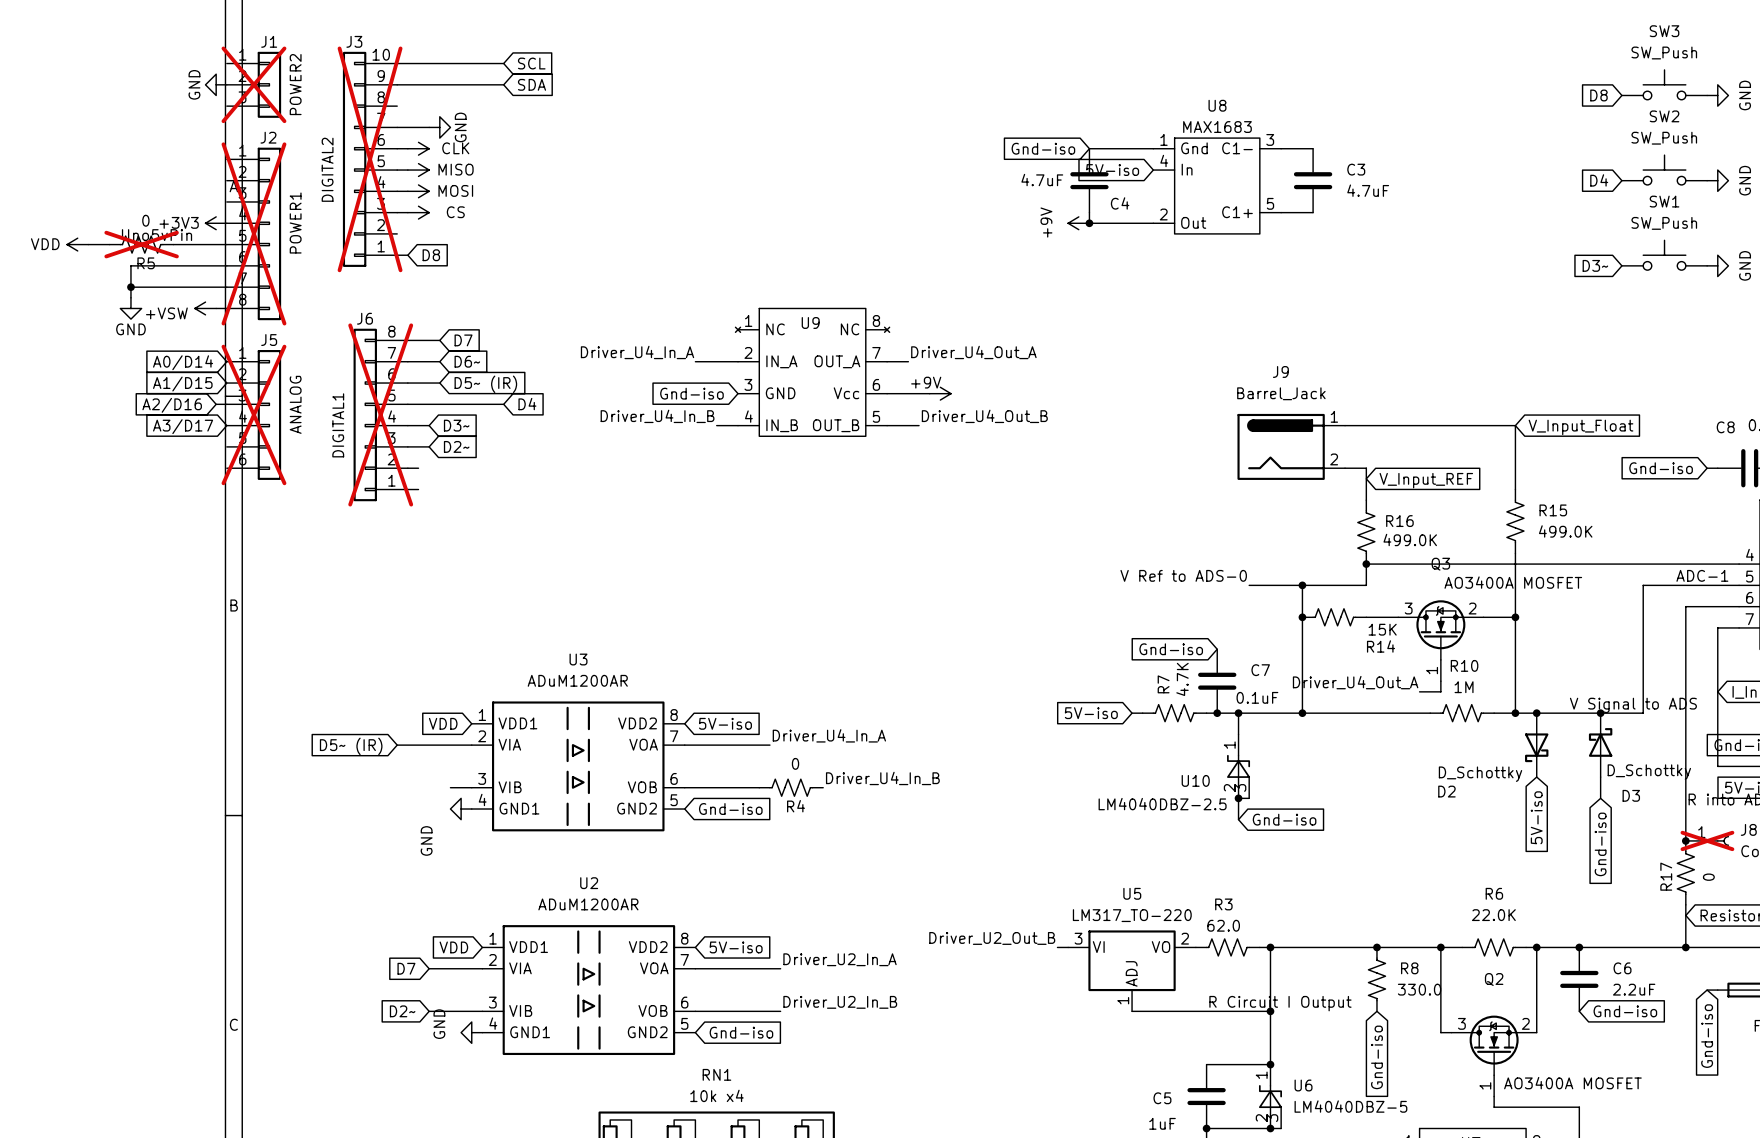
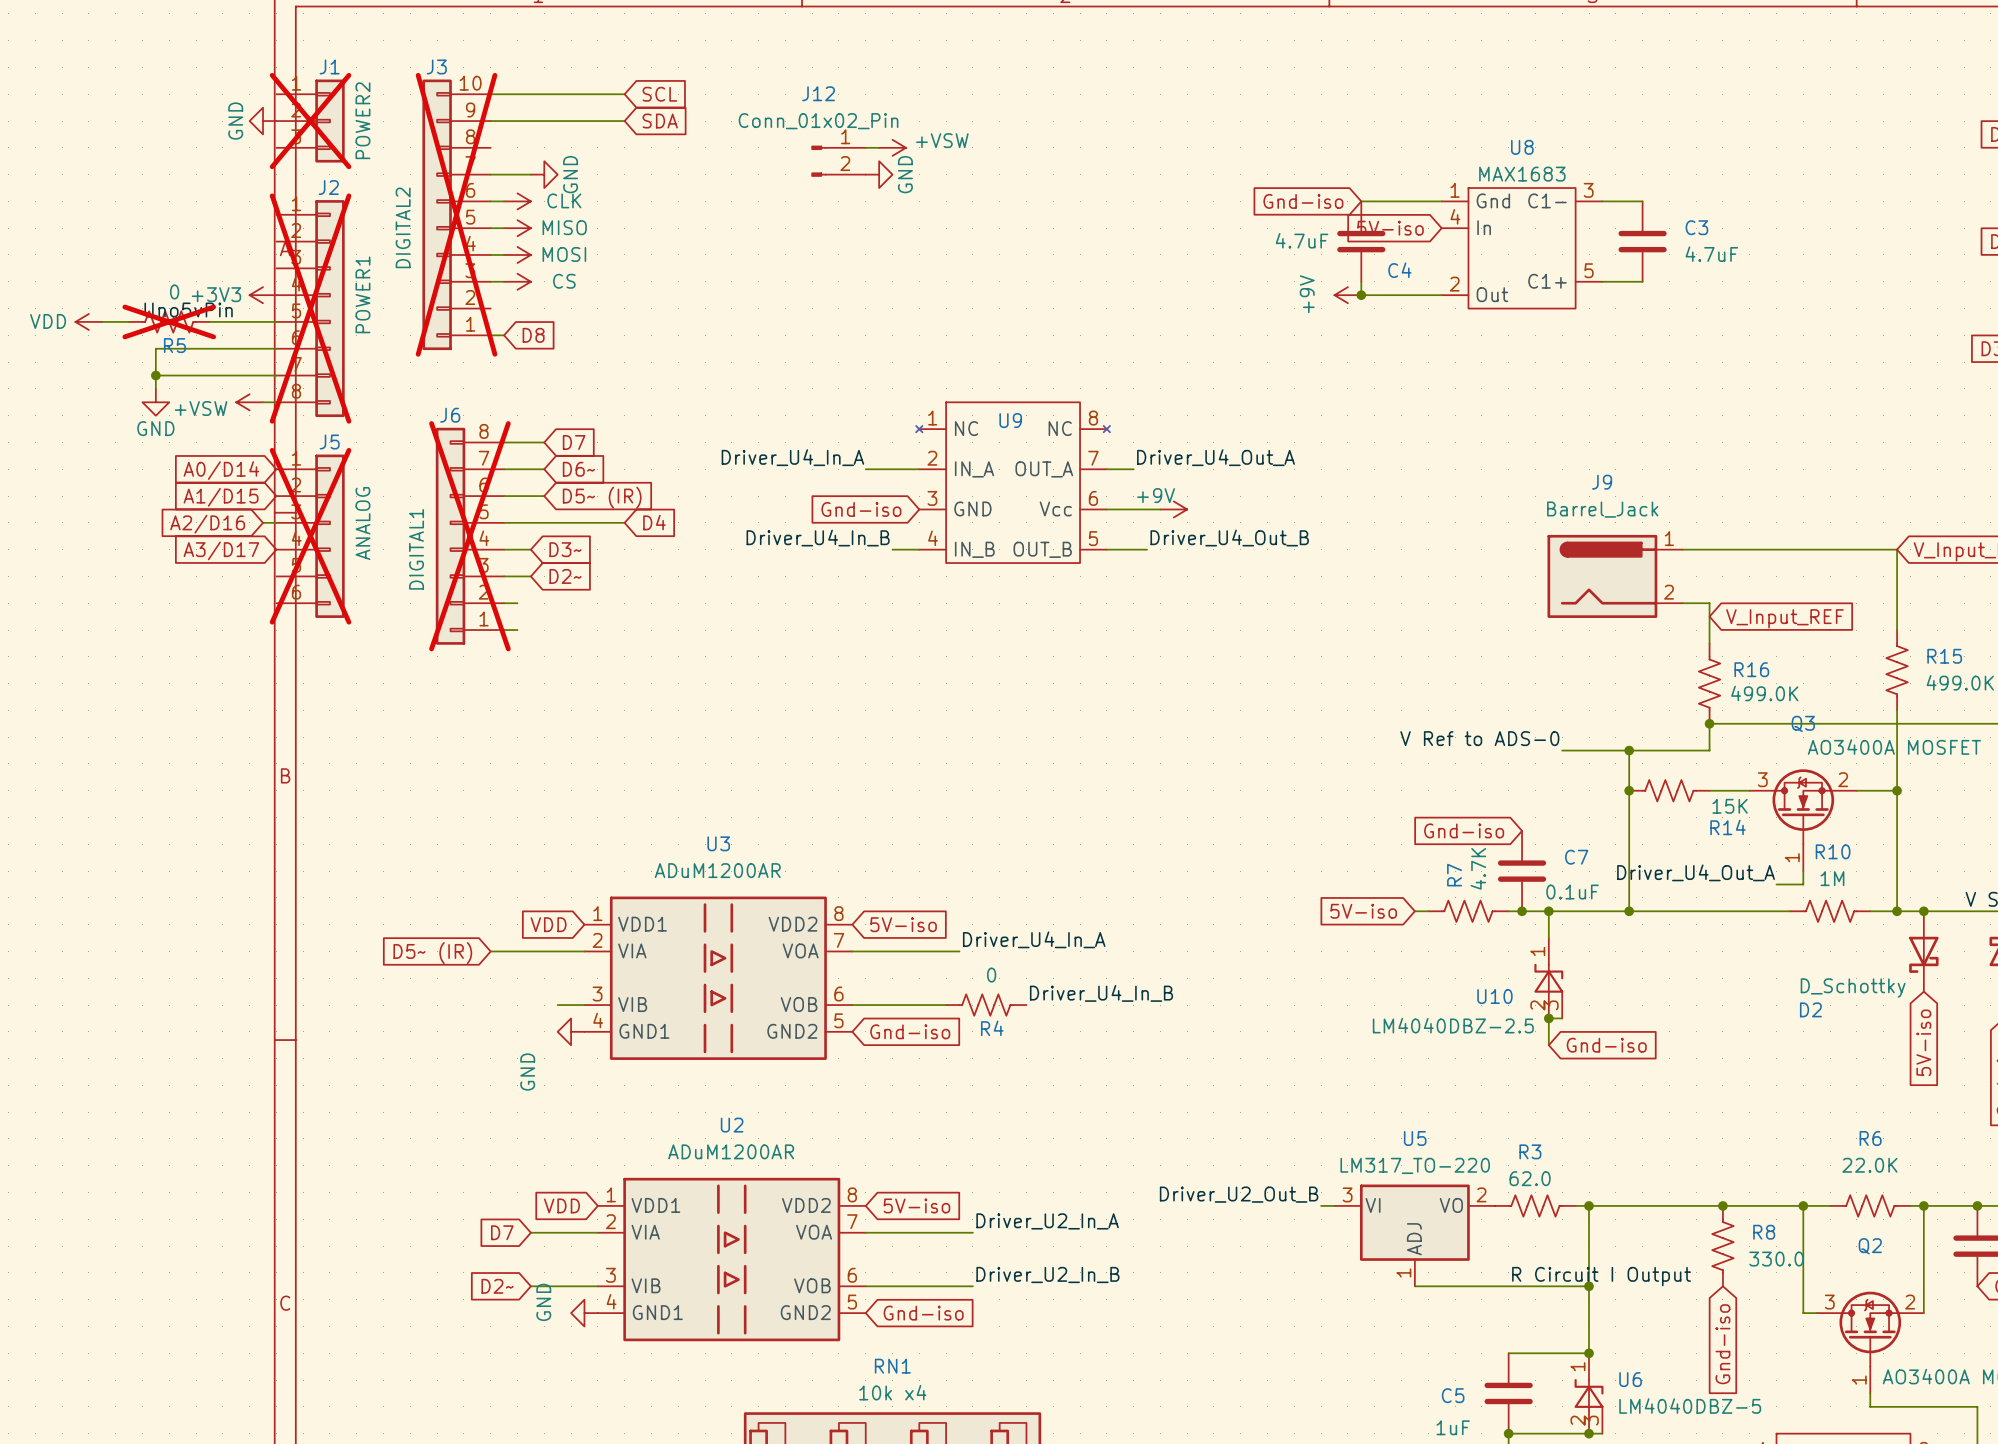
wire: none -> (865, 147) (879, 147)
power symbol: none -> +VSW (892, 147)
J12: none -> Conn_01x02_Pin (838, 161)
power symbol: none -> GND (879, 174)

